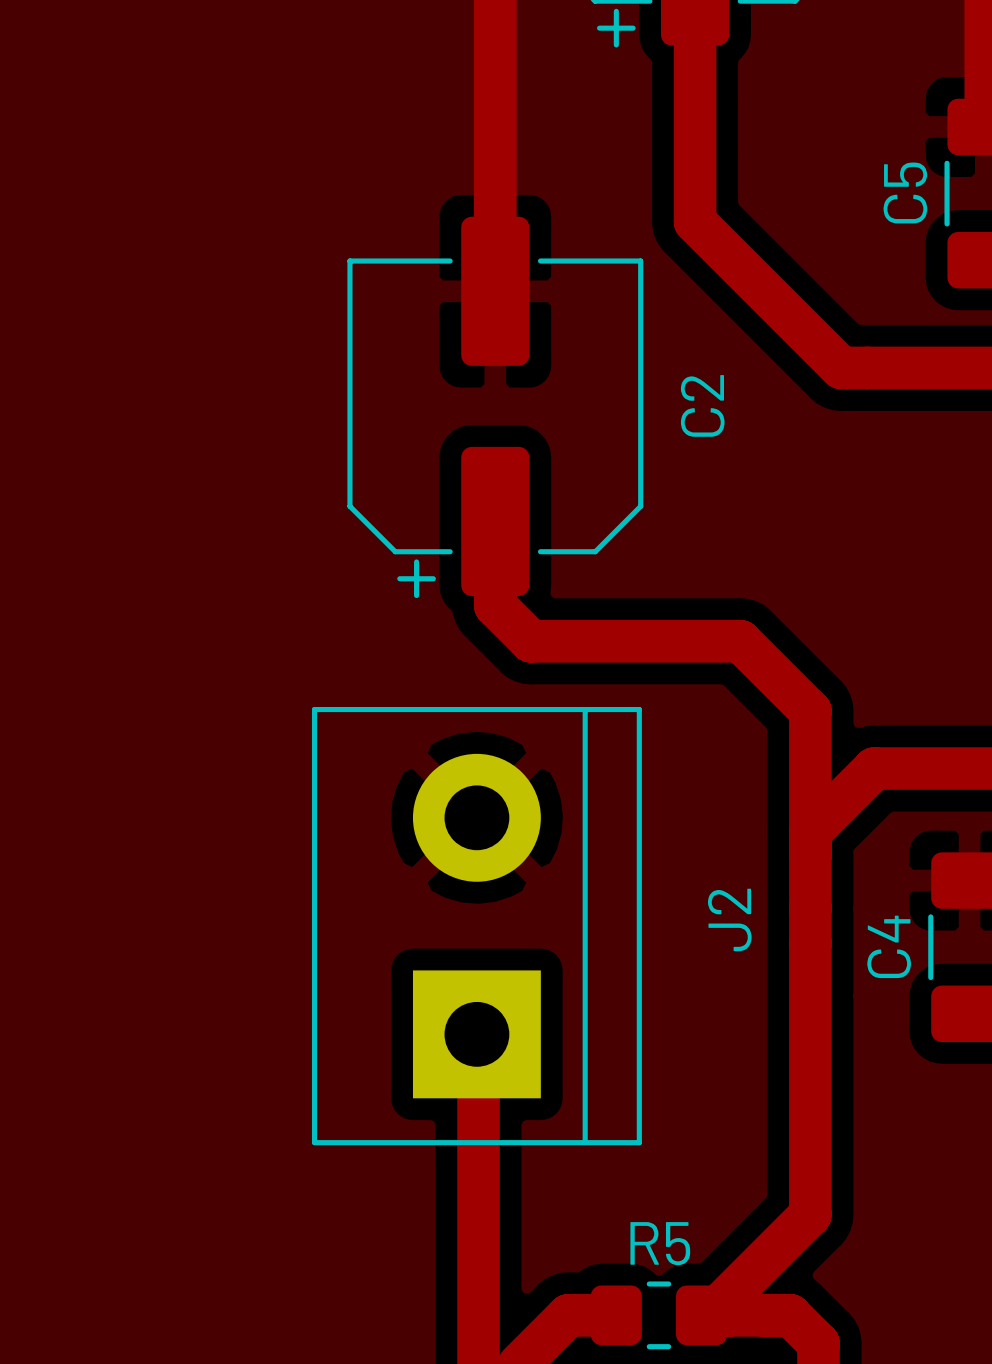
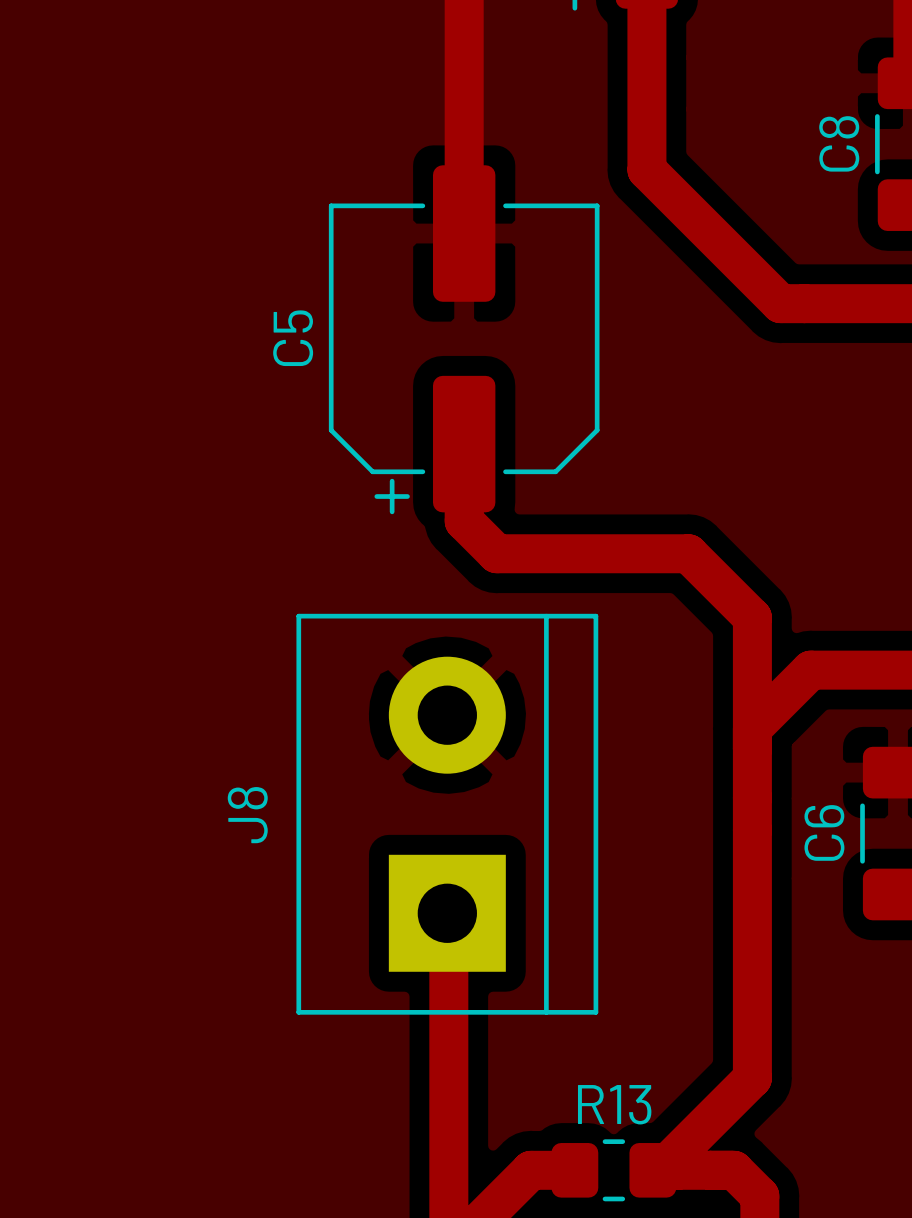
C5 name: C5 (905, 192) -> C8 (839, 143)
C2 name: C2 (702, 405) -> C5 (293, 338)
J2 name: J2 (729, 919) -> J8 (247, 815)
C4 name: C4 (889, 946) -> C6 (824, 832)
R5 name: R5 (660, 1243) -> R13 (614, 1104)

